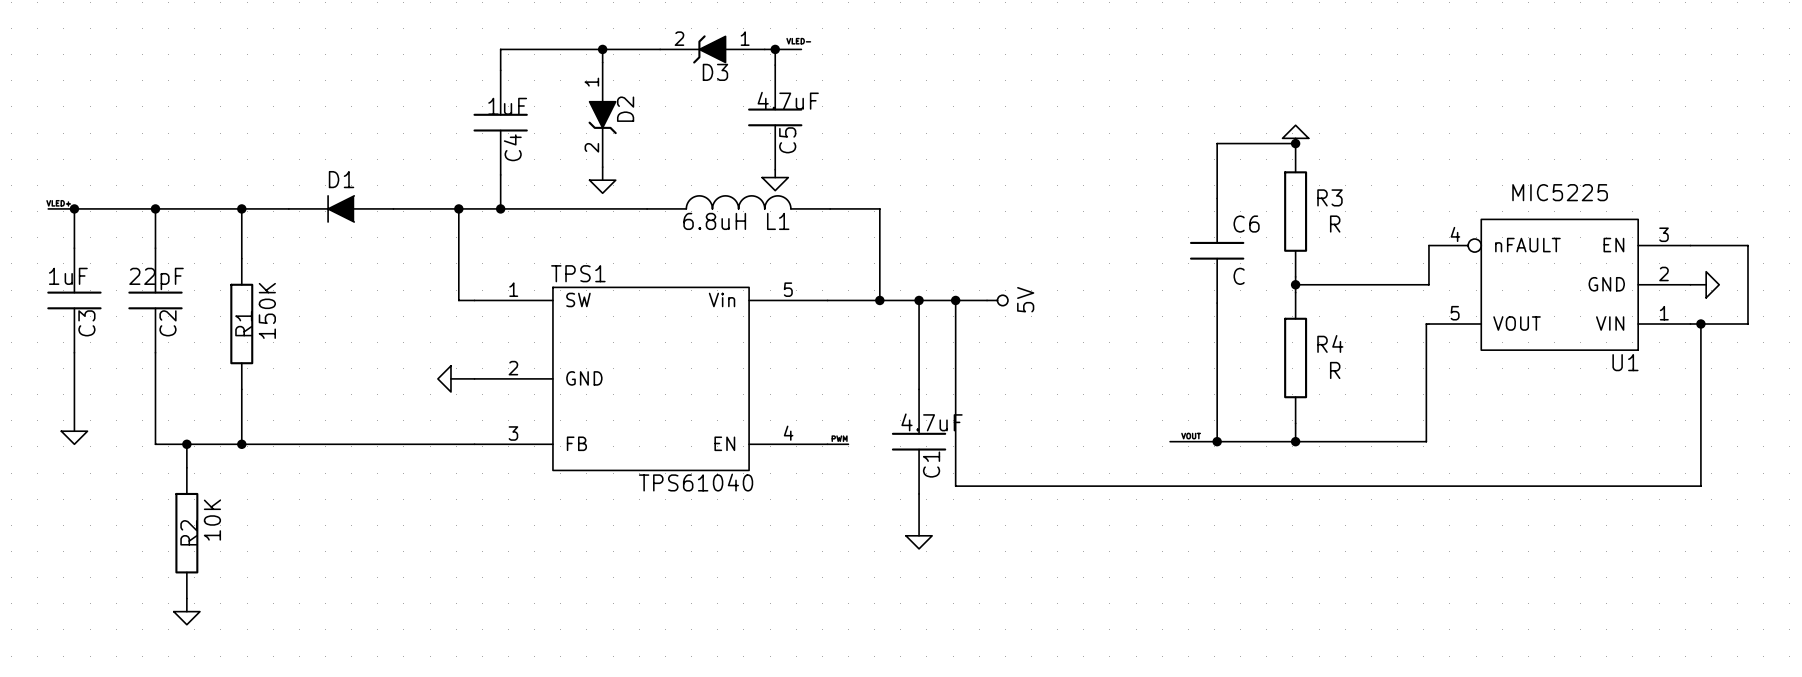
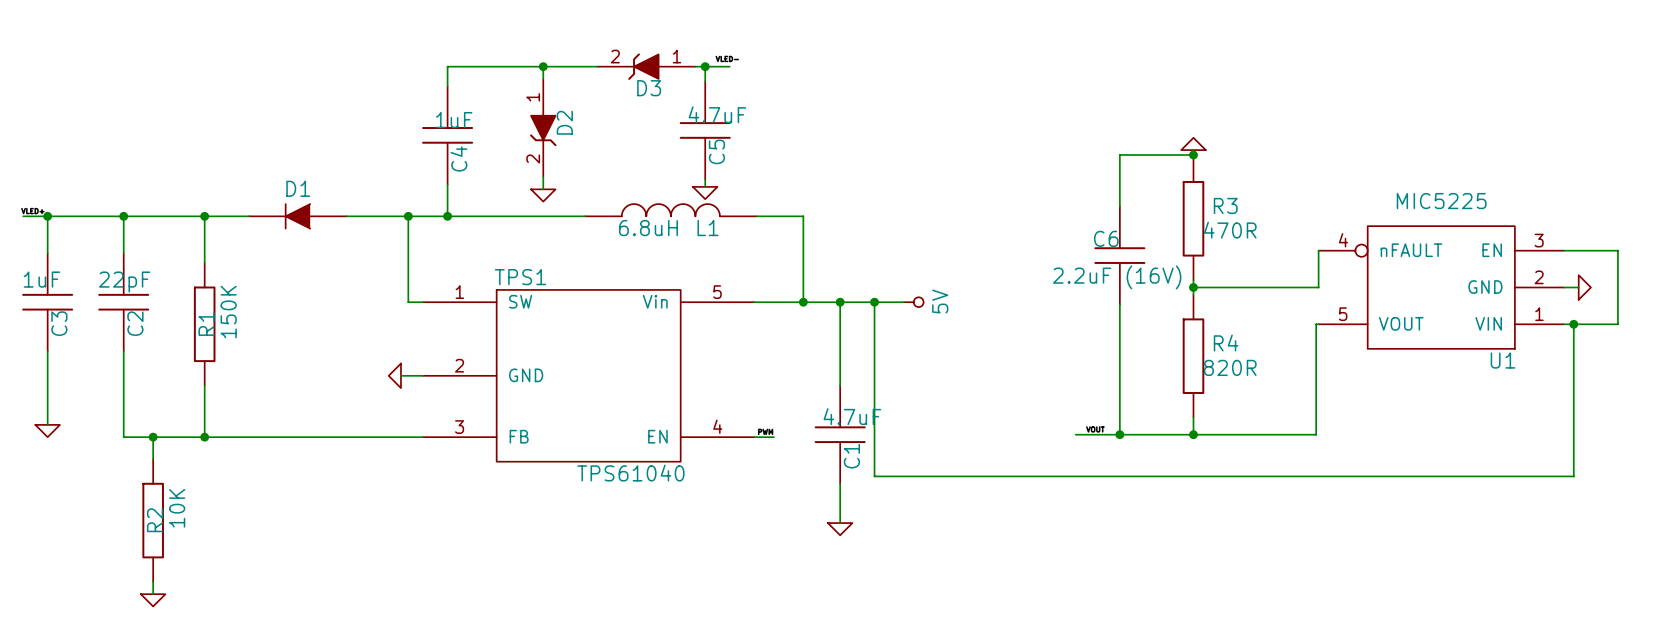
C6 name position: C6 (1246, 224) -> C6 (1106, 238)
R3 value: R (1335, 224) -> 470R (1230, 230)
C6 value: C (1239, 276) -> 2.2uF (16V) (1117, 277)
R4 value: R (1335, 370) -> 820R (1230, 367)

